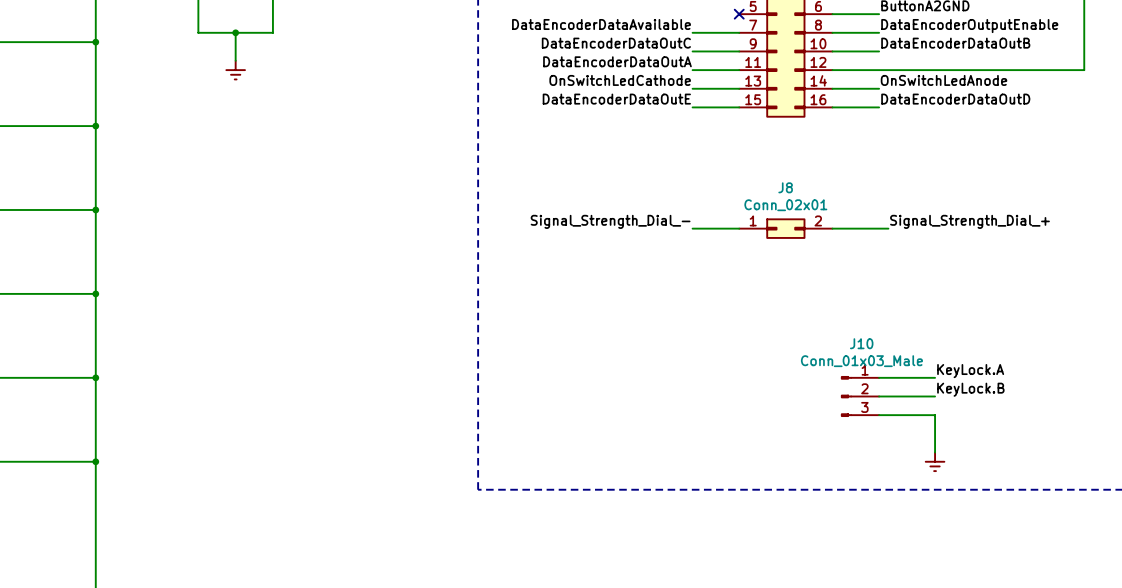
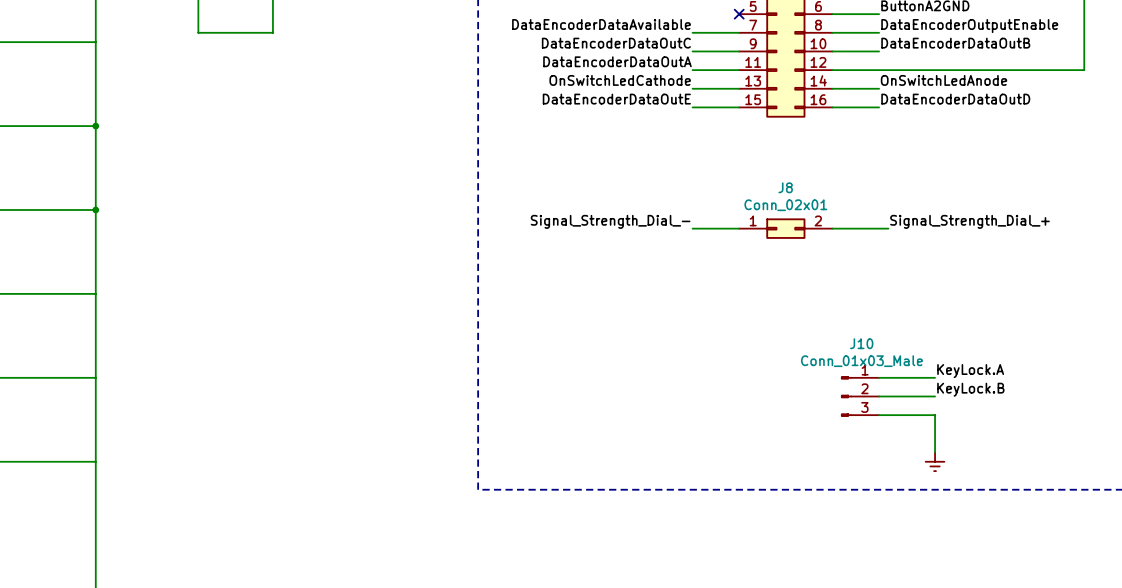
wire: (235, 32) (235, 60) -> none
junction: (235, 32) -> none
junction: (95, 42) -> none
power symbol: (235, 70) -> none
junction: (95, 293) -> none
junction: (95, 377) -> none
junction: (95, 461) -> none

